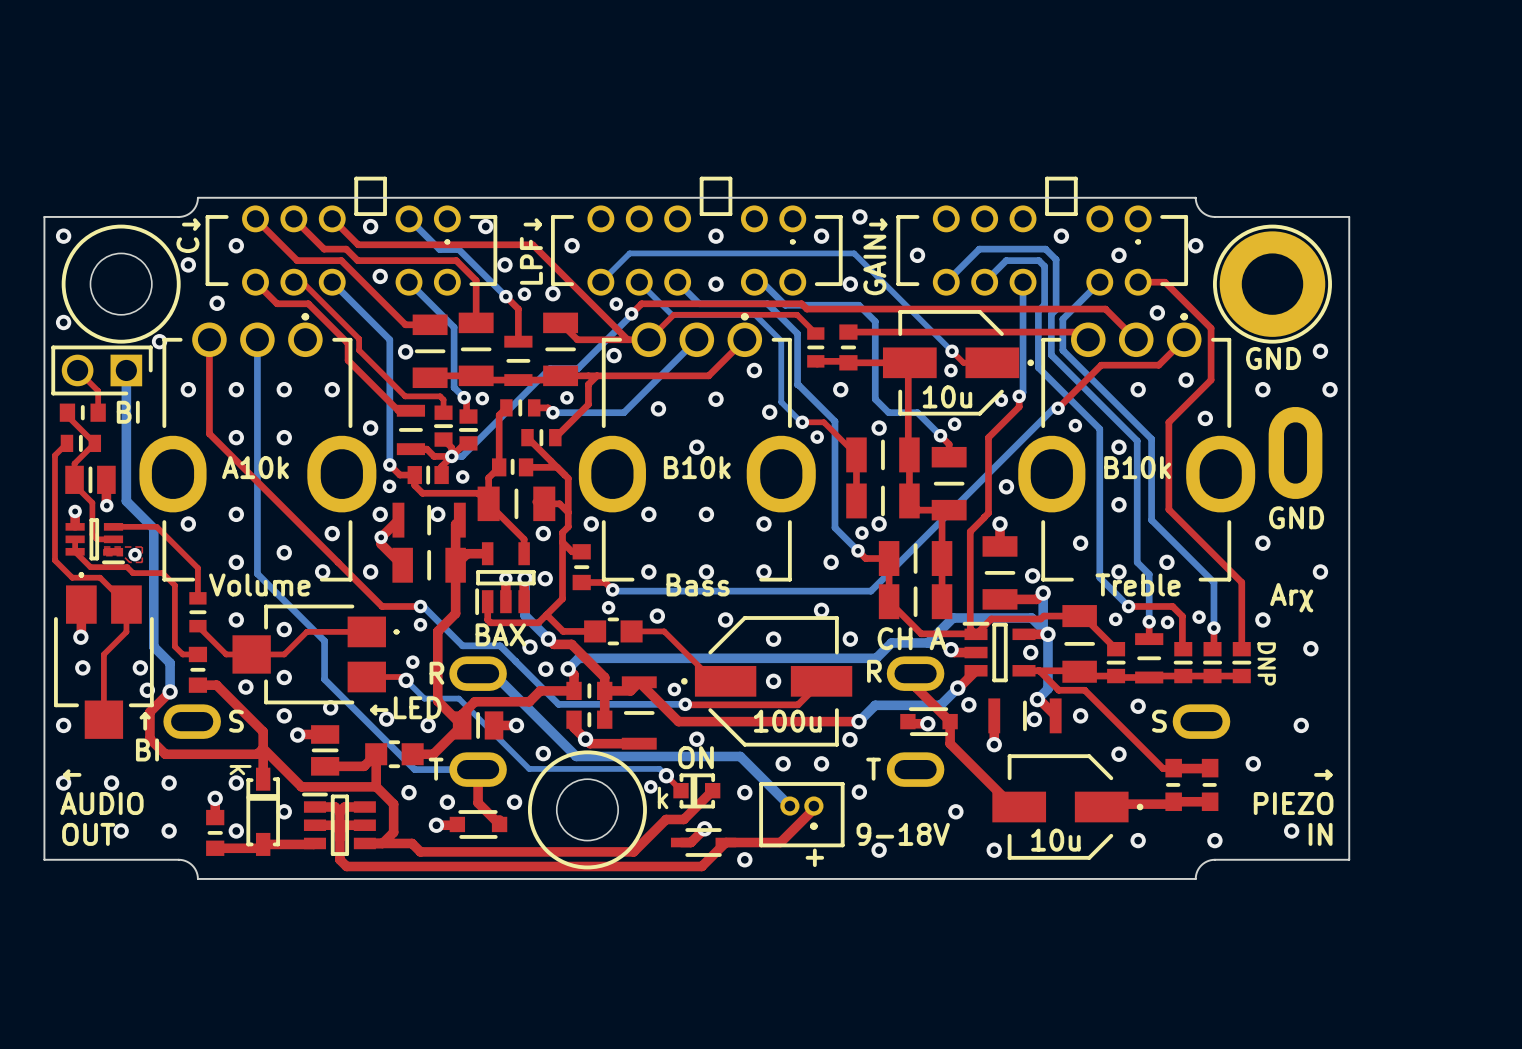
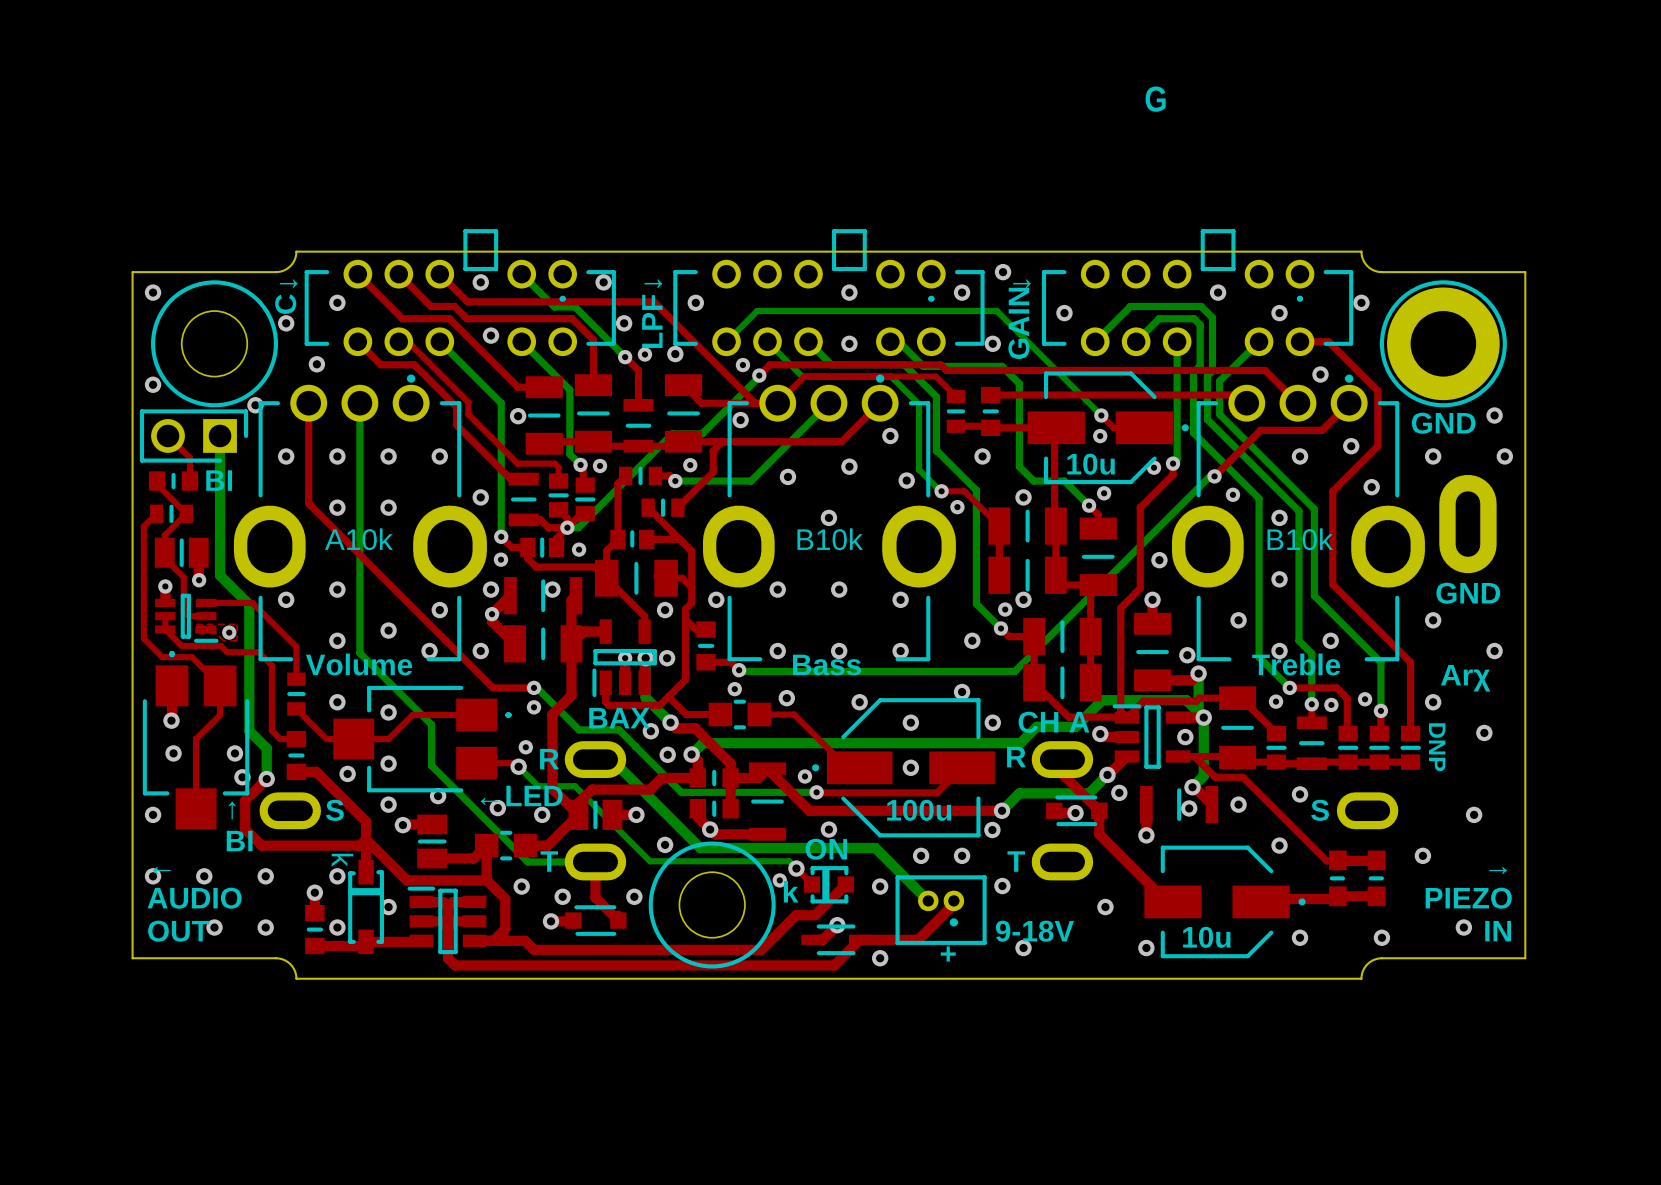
text: none -> G (1155, 99)

